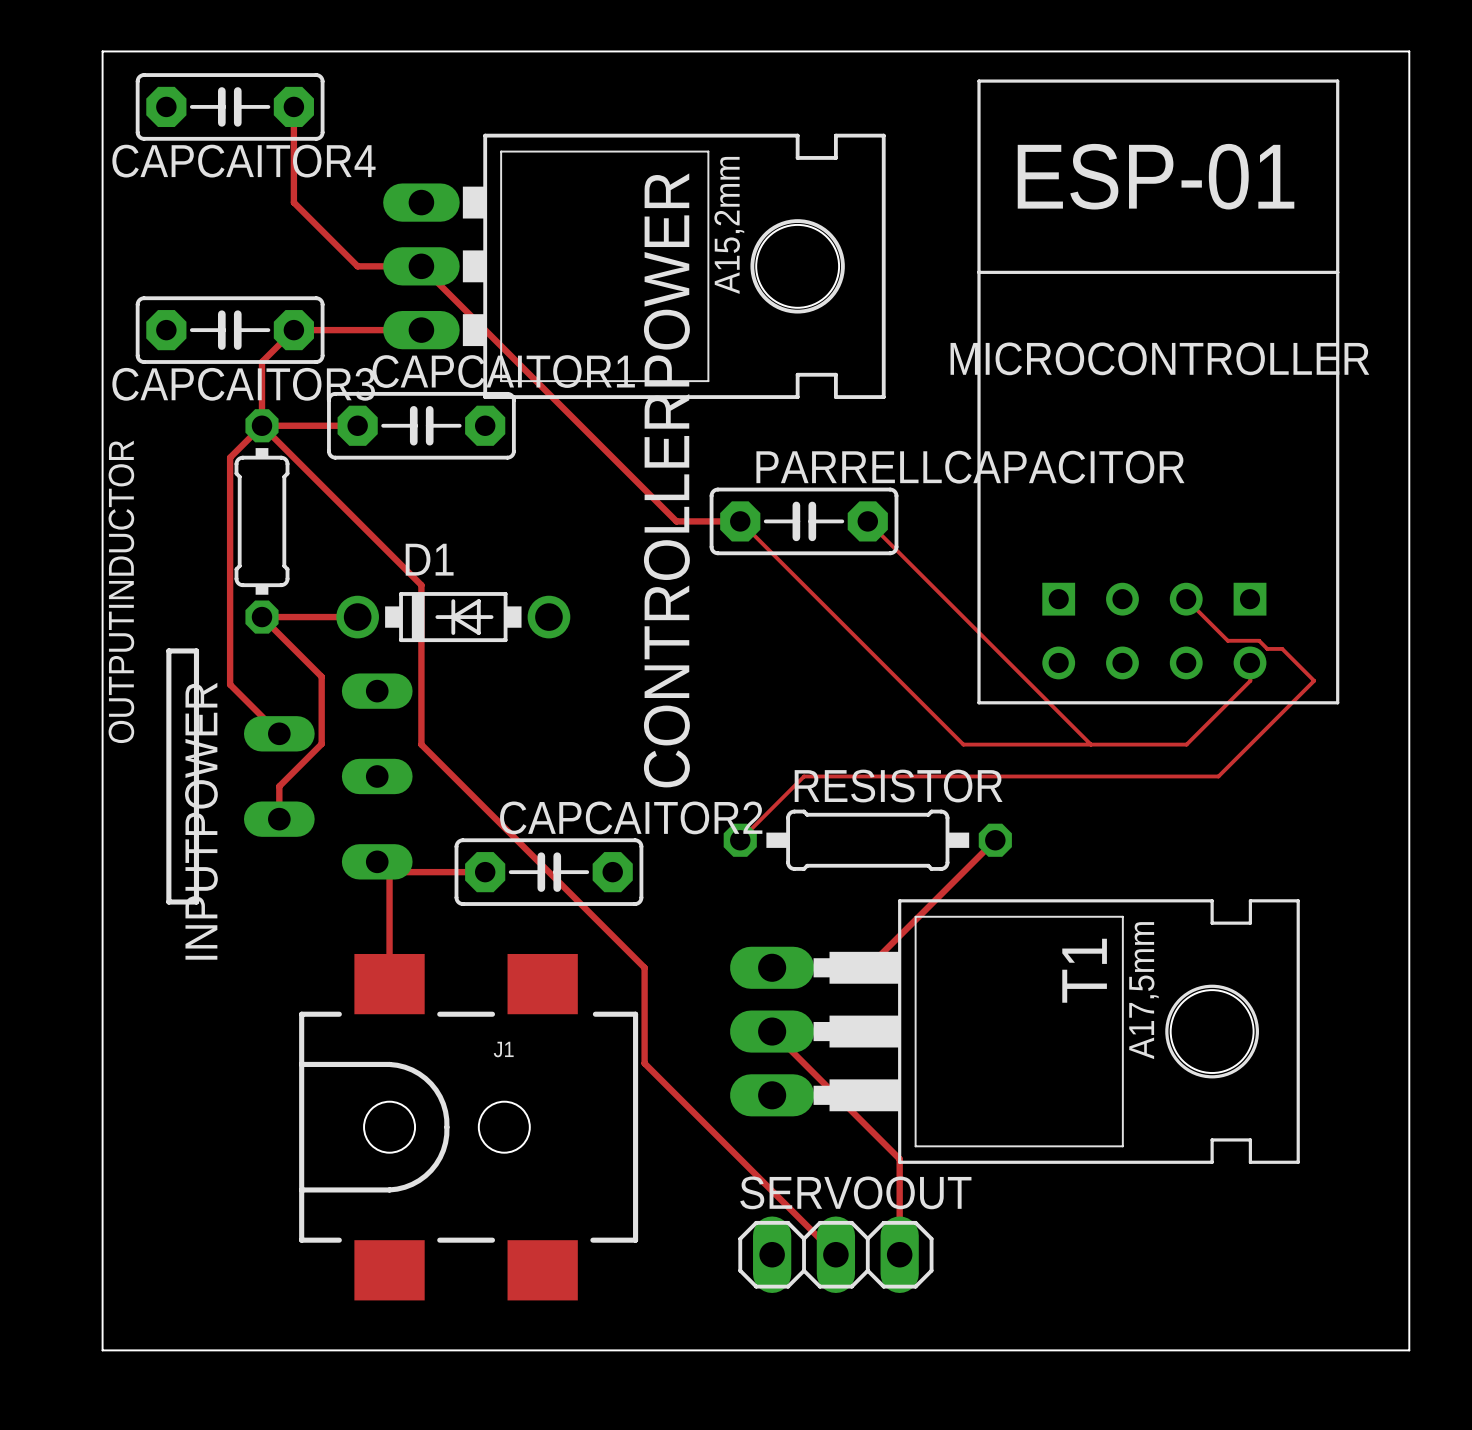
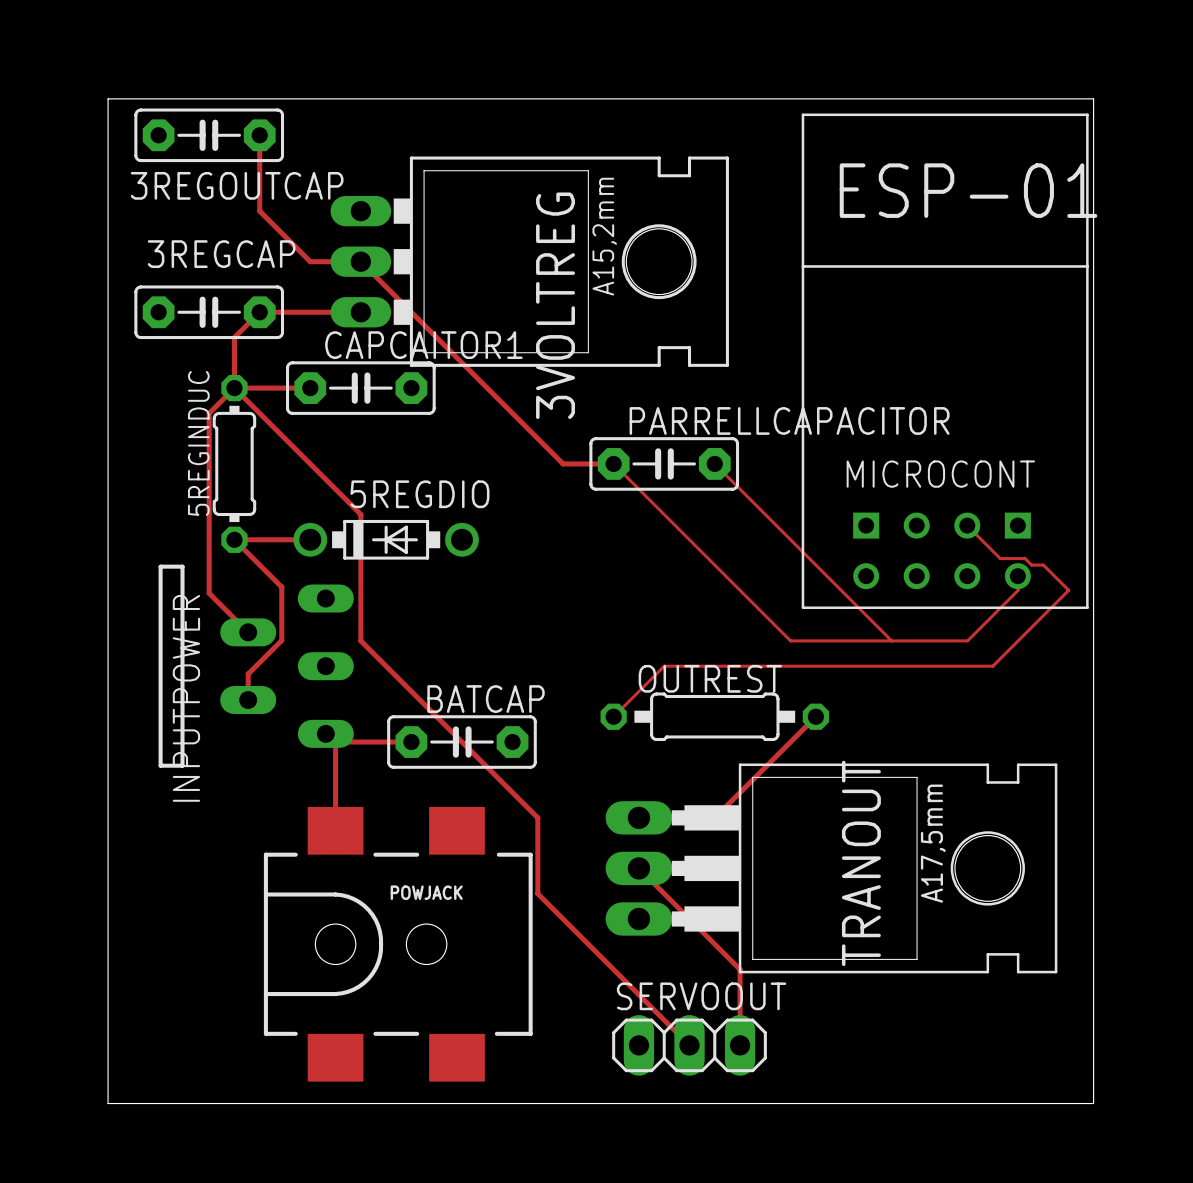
board edge: (102, 61) (102, 51) (1409, 51) (1409, 1350) (102, 1350) (102, 1328) -> (108, 98) (1093, 98) (1093, 1103) (108, 1103)
CAPCAITOR4 name: CAPCAITOR4 (243, 161) -> 3REGOUTCAP (237, 185)
MICROCONTROLLER name: MICROCONTROLLER (1159, 358) -> MICROCONT (940, 474)
CAPCAITOR3 name: CAPCAITOR3 (243, 384) -> 3REGCAP (221, 254)
CONTROLLERPOWER name: CONTROLLERPOWER (666, 480) -> 3VOLTREG (555, 305)
D1 name: D1 (429, 559) -> 5REGDIO (419, 494)
OUTPUTINDUCTOR name: OUTPUTINDUCTOR (121, 591) -> 5REGINDUC (198, 443)
RESISTOR name: RESISTOR (898, 786) -> OUTREST (710, 678)
CAPCAITOR2 name: CAPCAITOR2 (631, 817) -> BATCAP (486, 699)
T1 name: T1 (1084, 970) -> TRANOUT (861, 863)
J1 name: J1 (503, 1049) -> POWJACK (426, 892)

